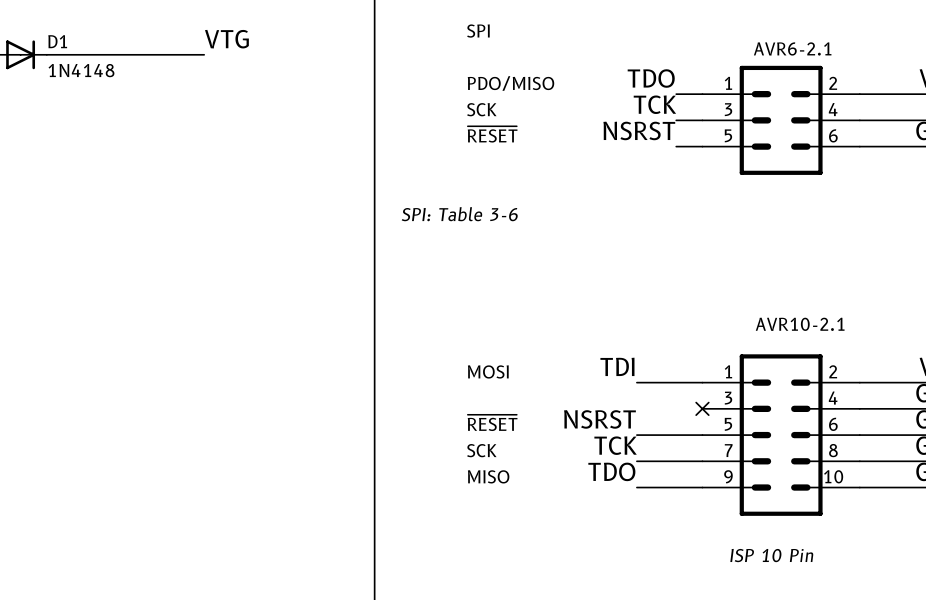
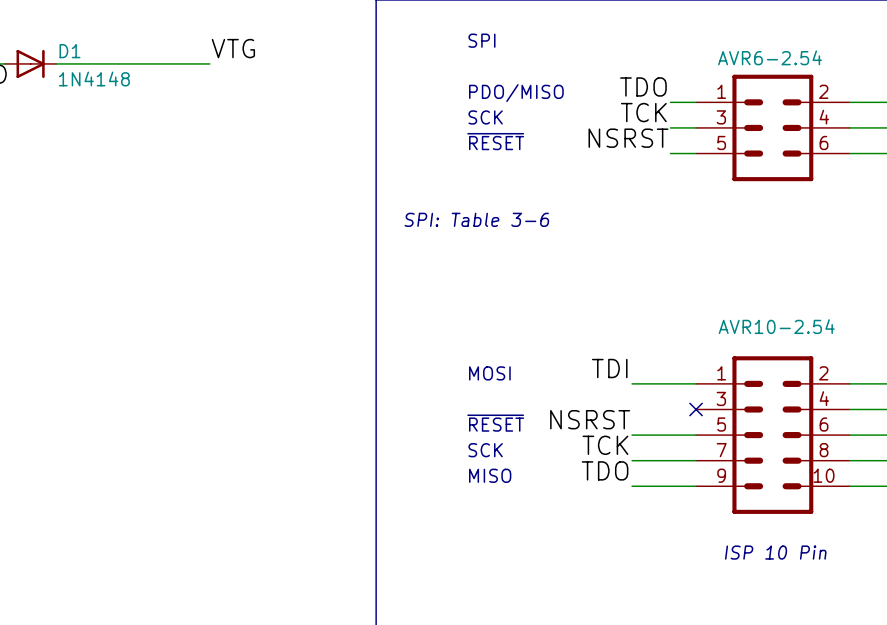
AVR6-2.1 name: AVR6-2.1 (792, 48) -> AVR6-2.54 (770, 57)
AVR10-2.1 name: AVR10-2.1 (800, 324) -> AVR10-2.54 (776, 326)

